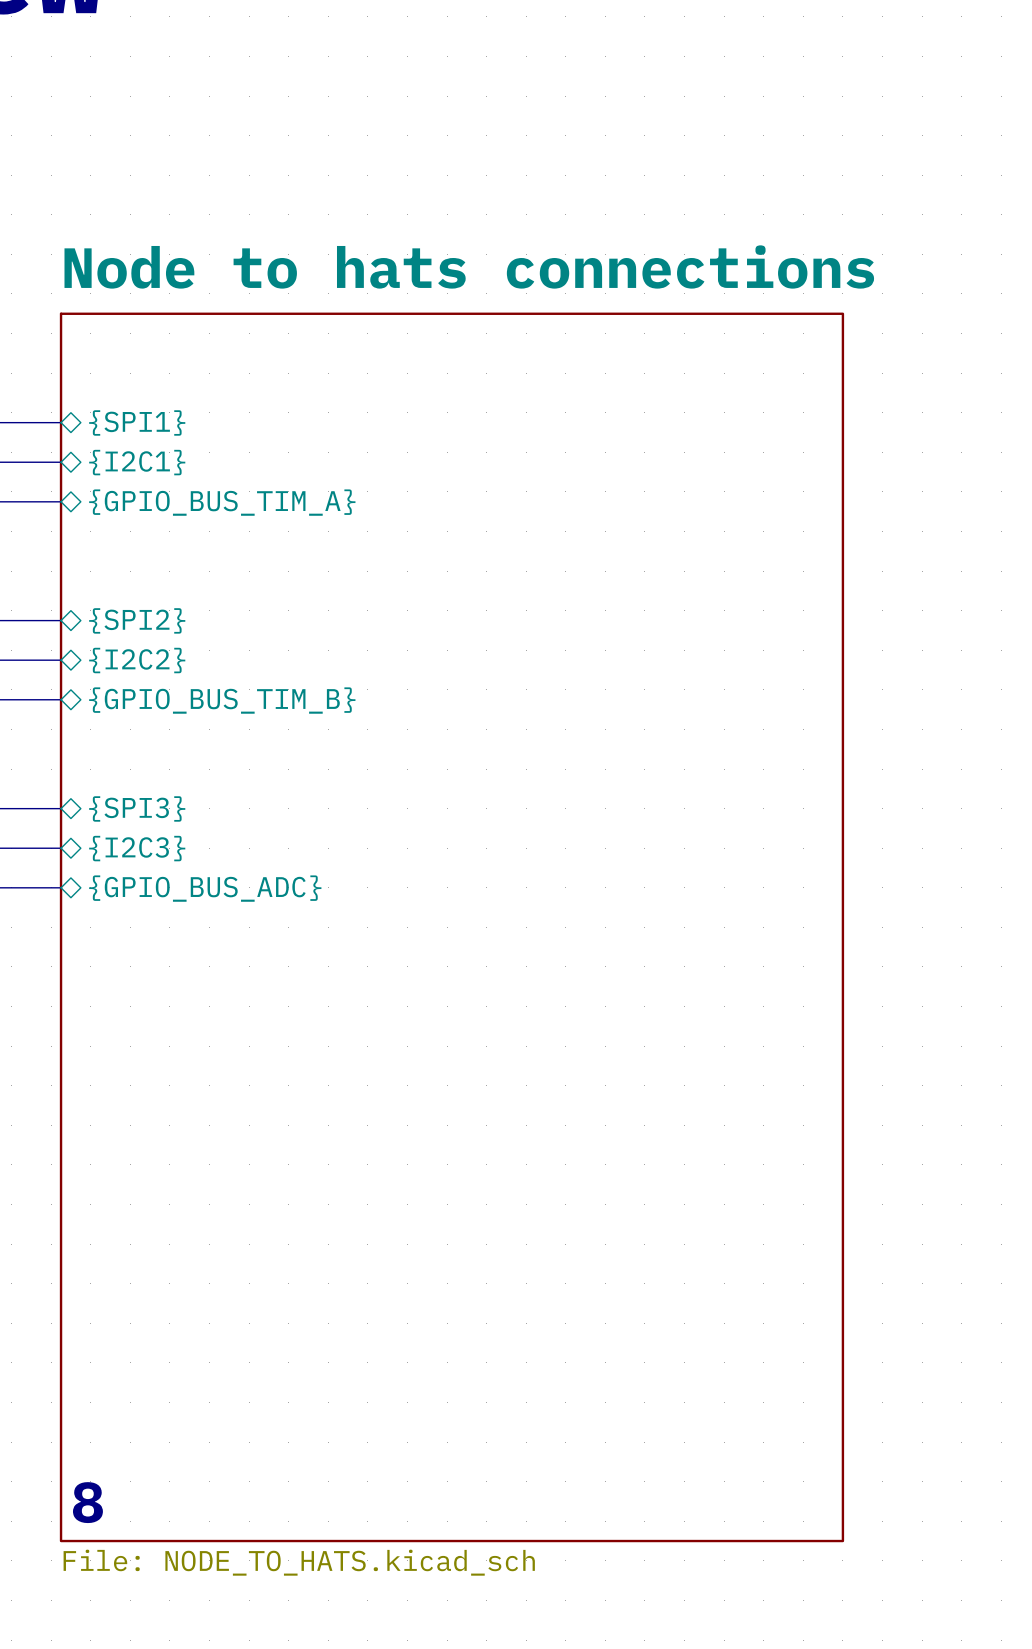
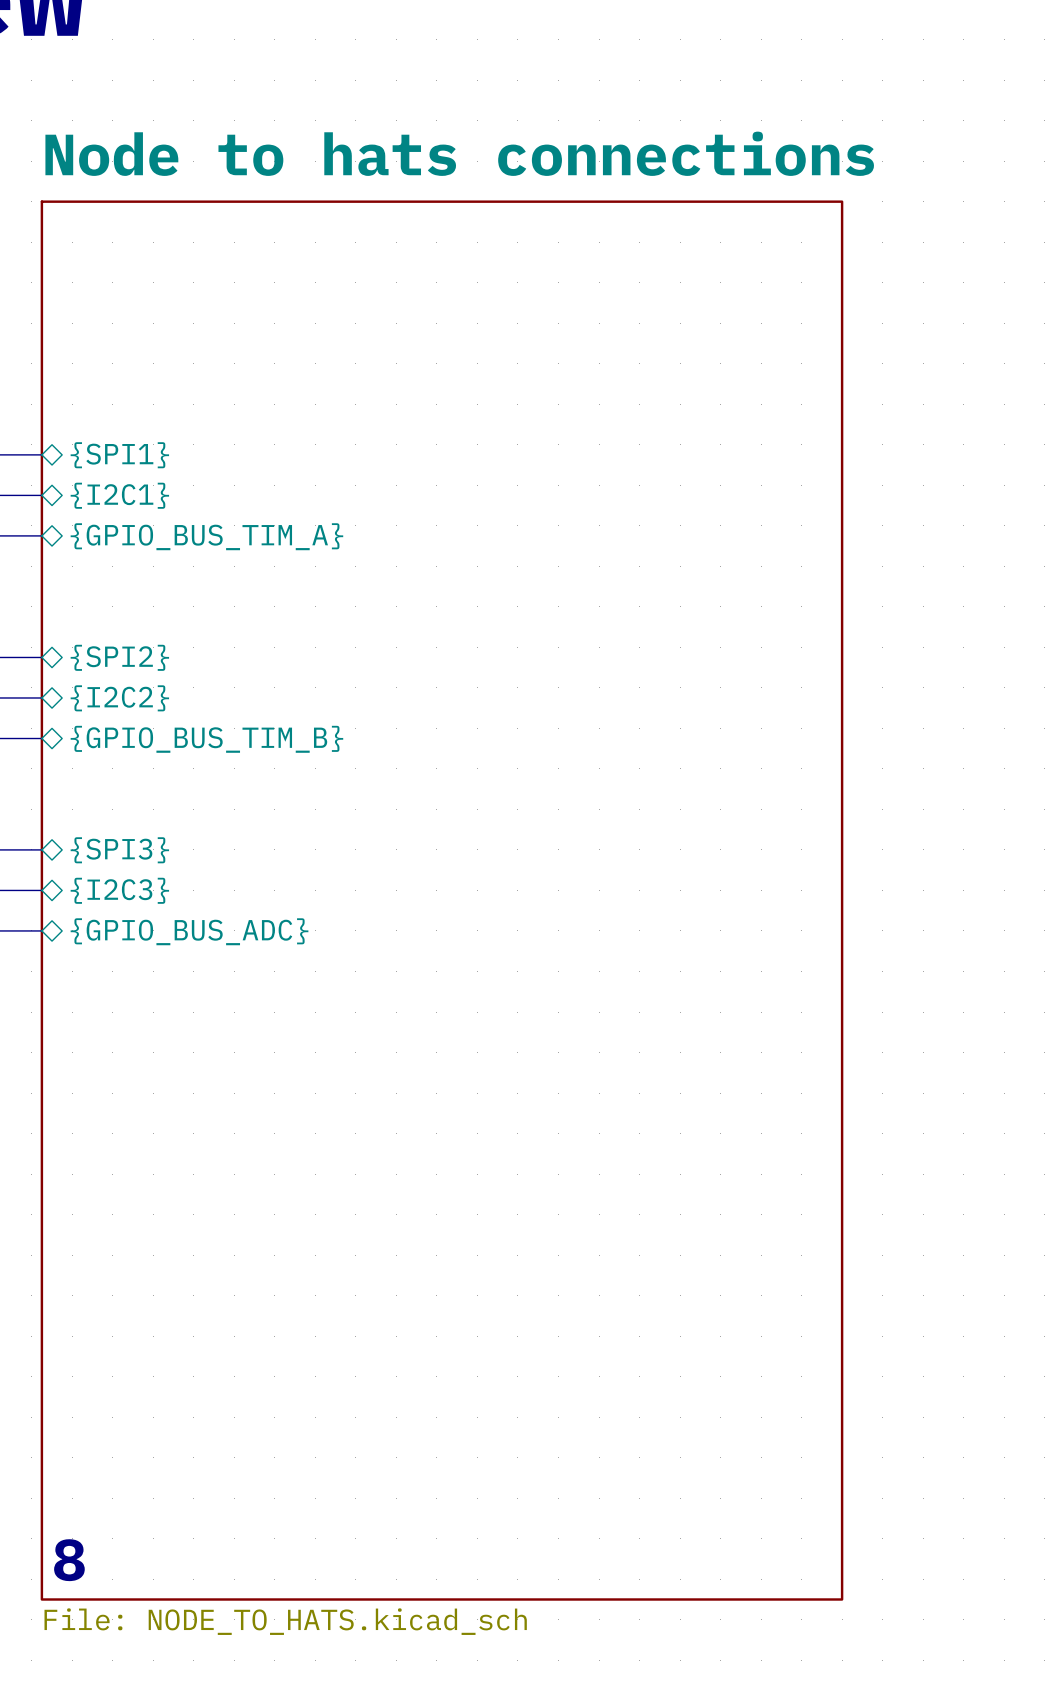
sheet Node to hats connections: none -> File: NODE_TO_HATS.kicad_sch (441, 900)
sheet Node to hats connections: File: NODE_TO_HATS.kicad_sch (451, 927) -> none

